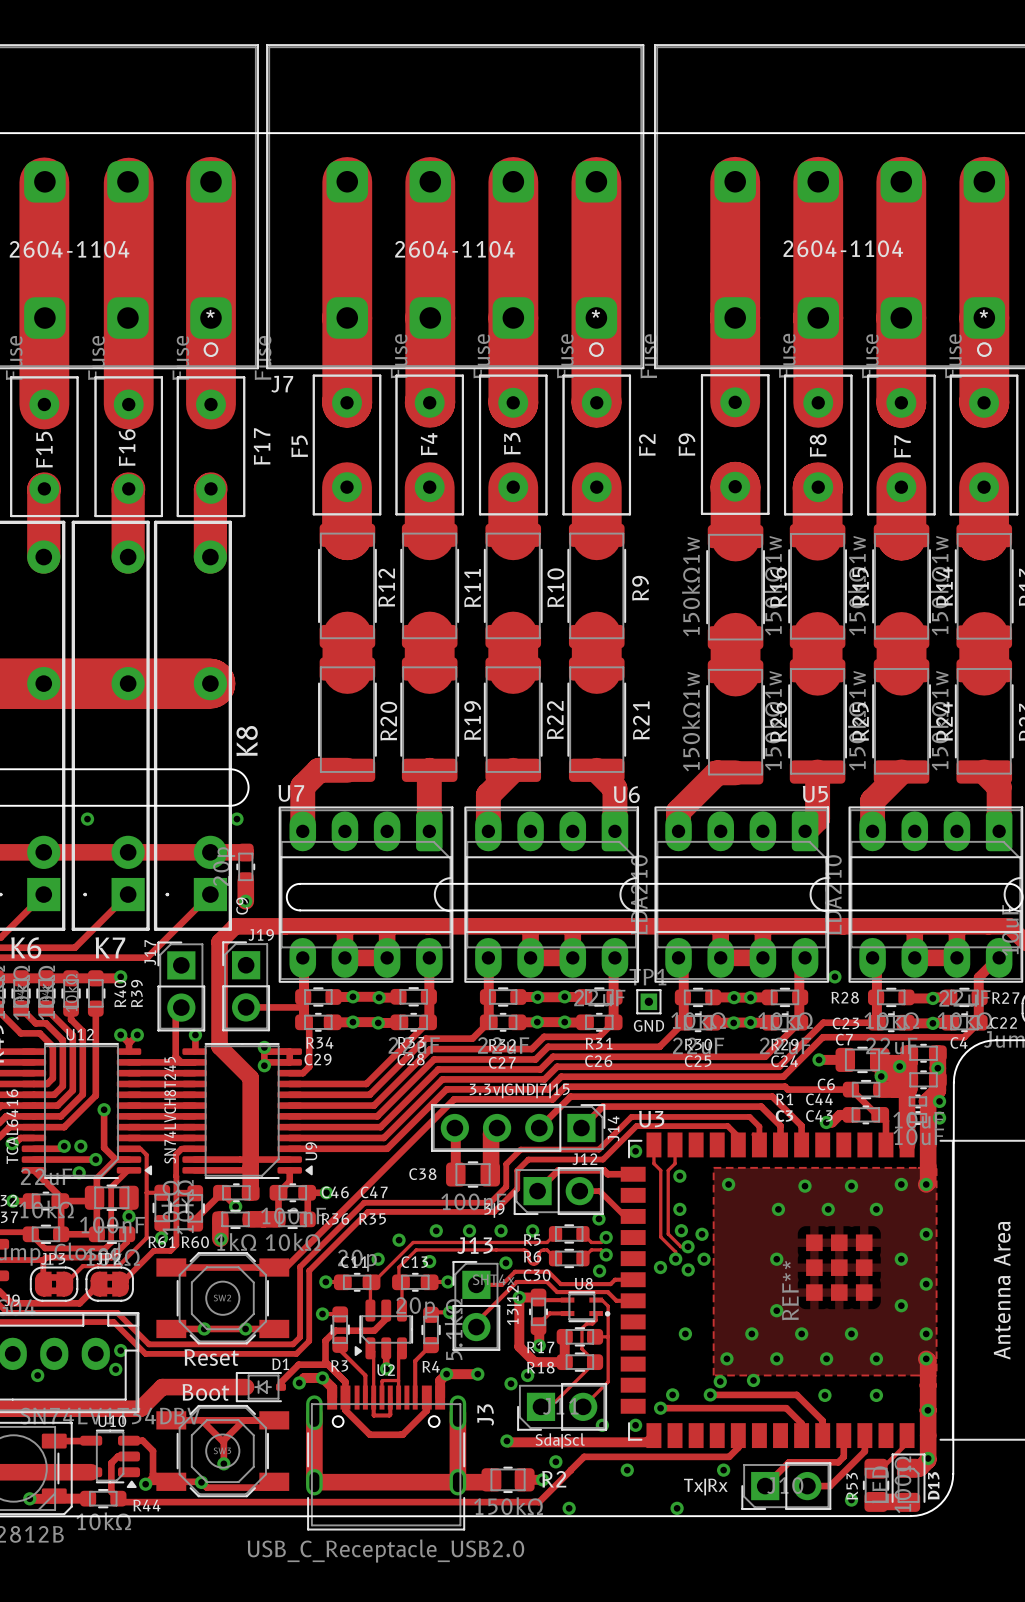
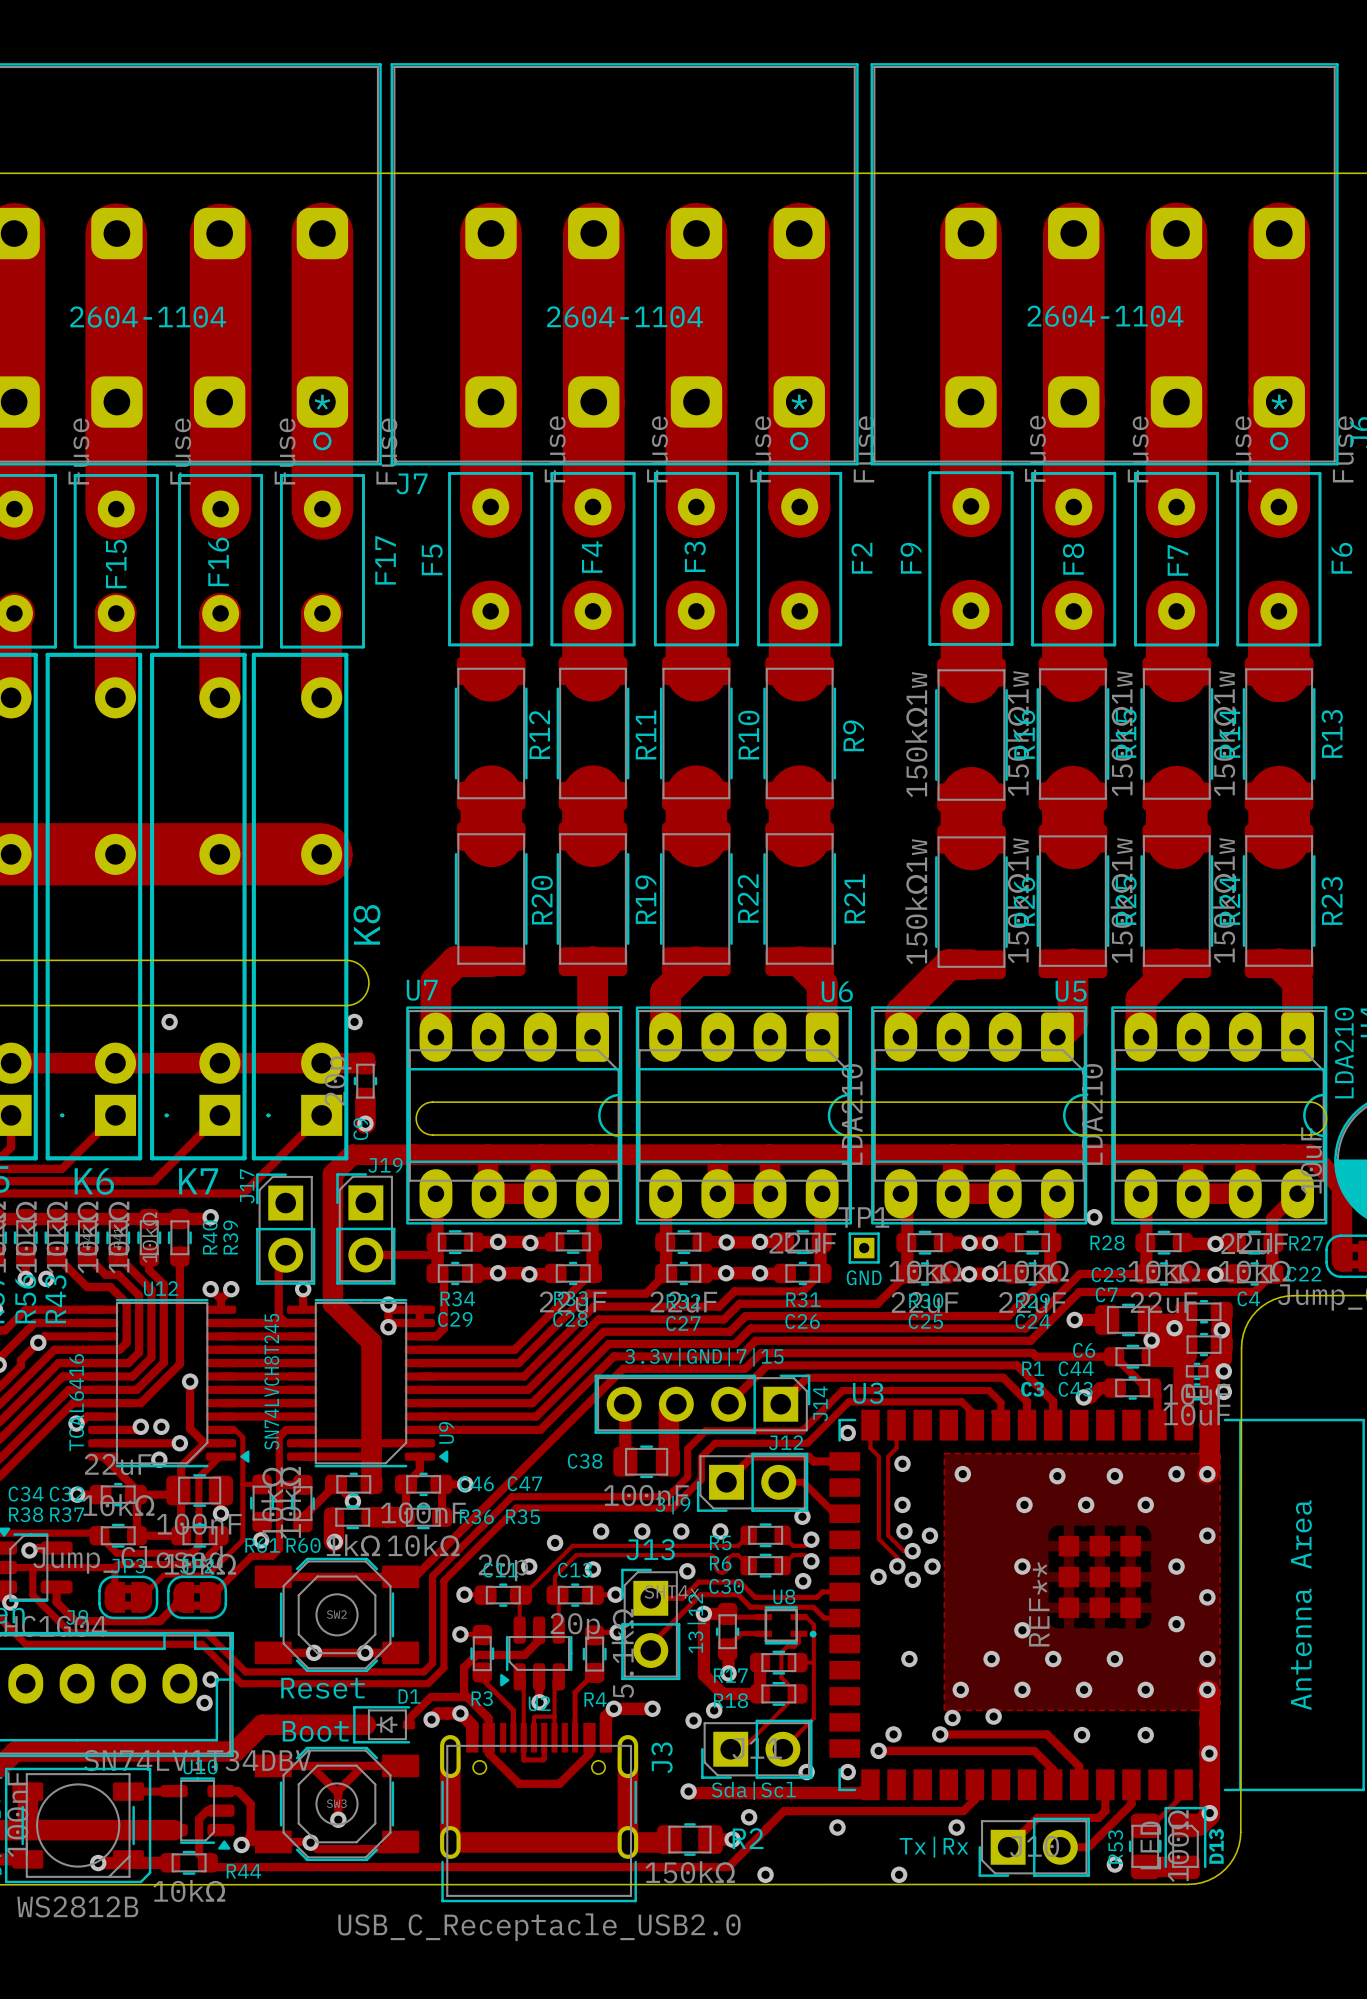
via: (37, 1375) -> none

